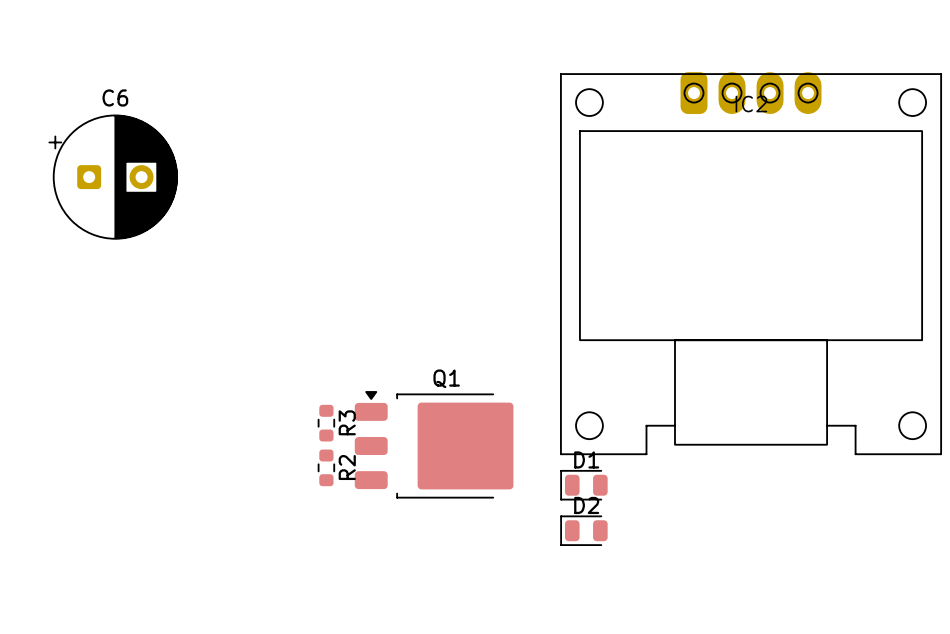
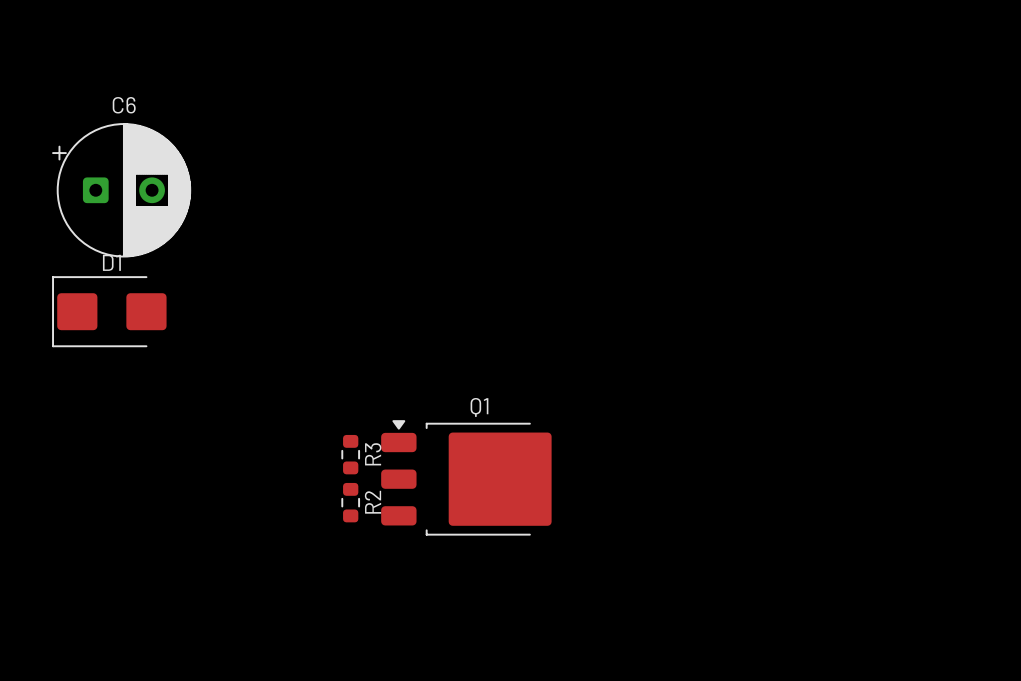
IC2: (751, 263) -> none
D1 footprint: [560, 469, 608, 501] -> [52, 276, 167, 348]
D2: (583, 530) -> none

